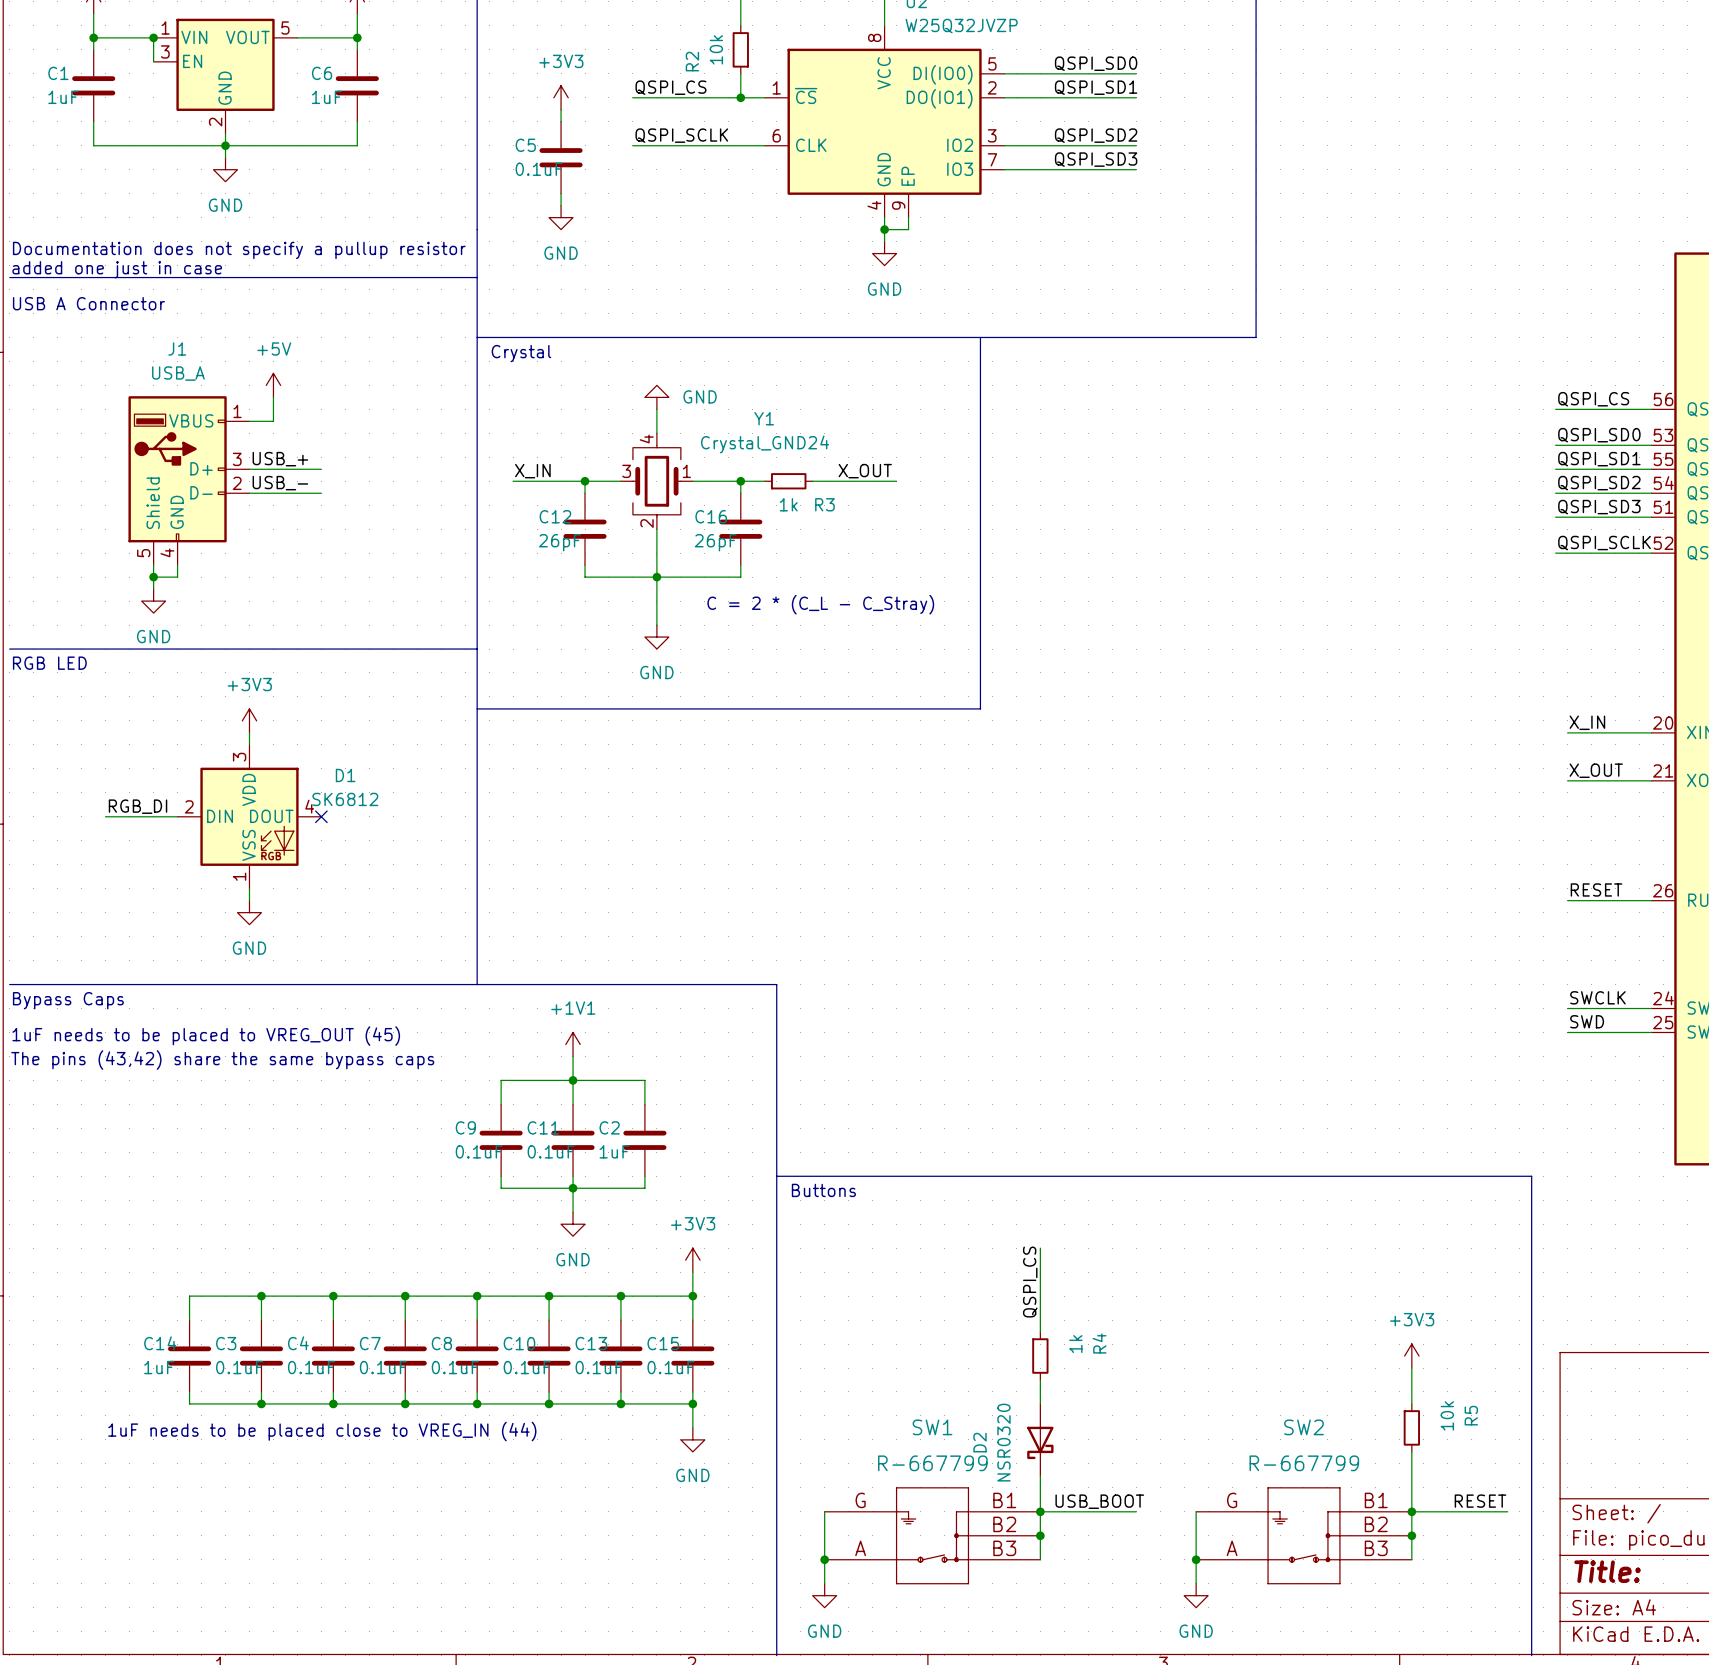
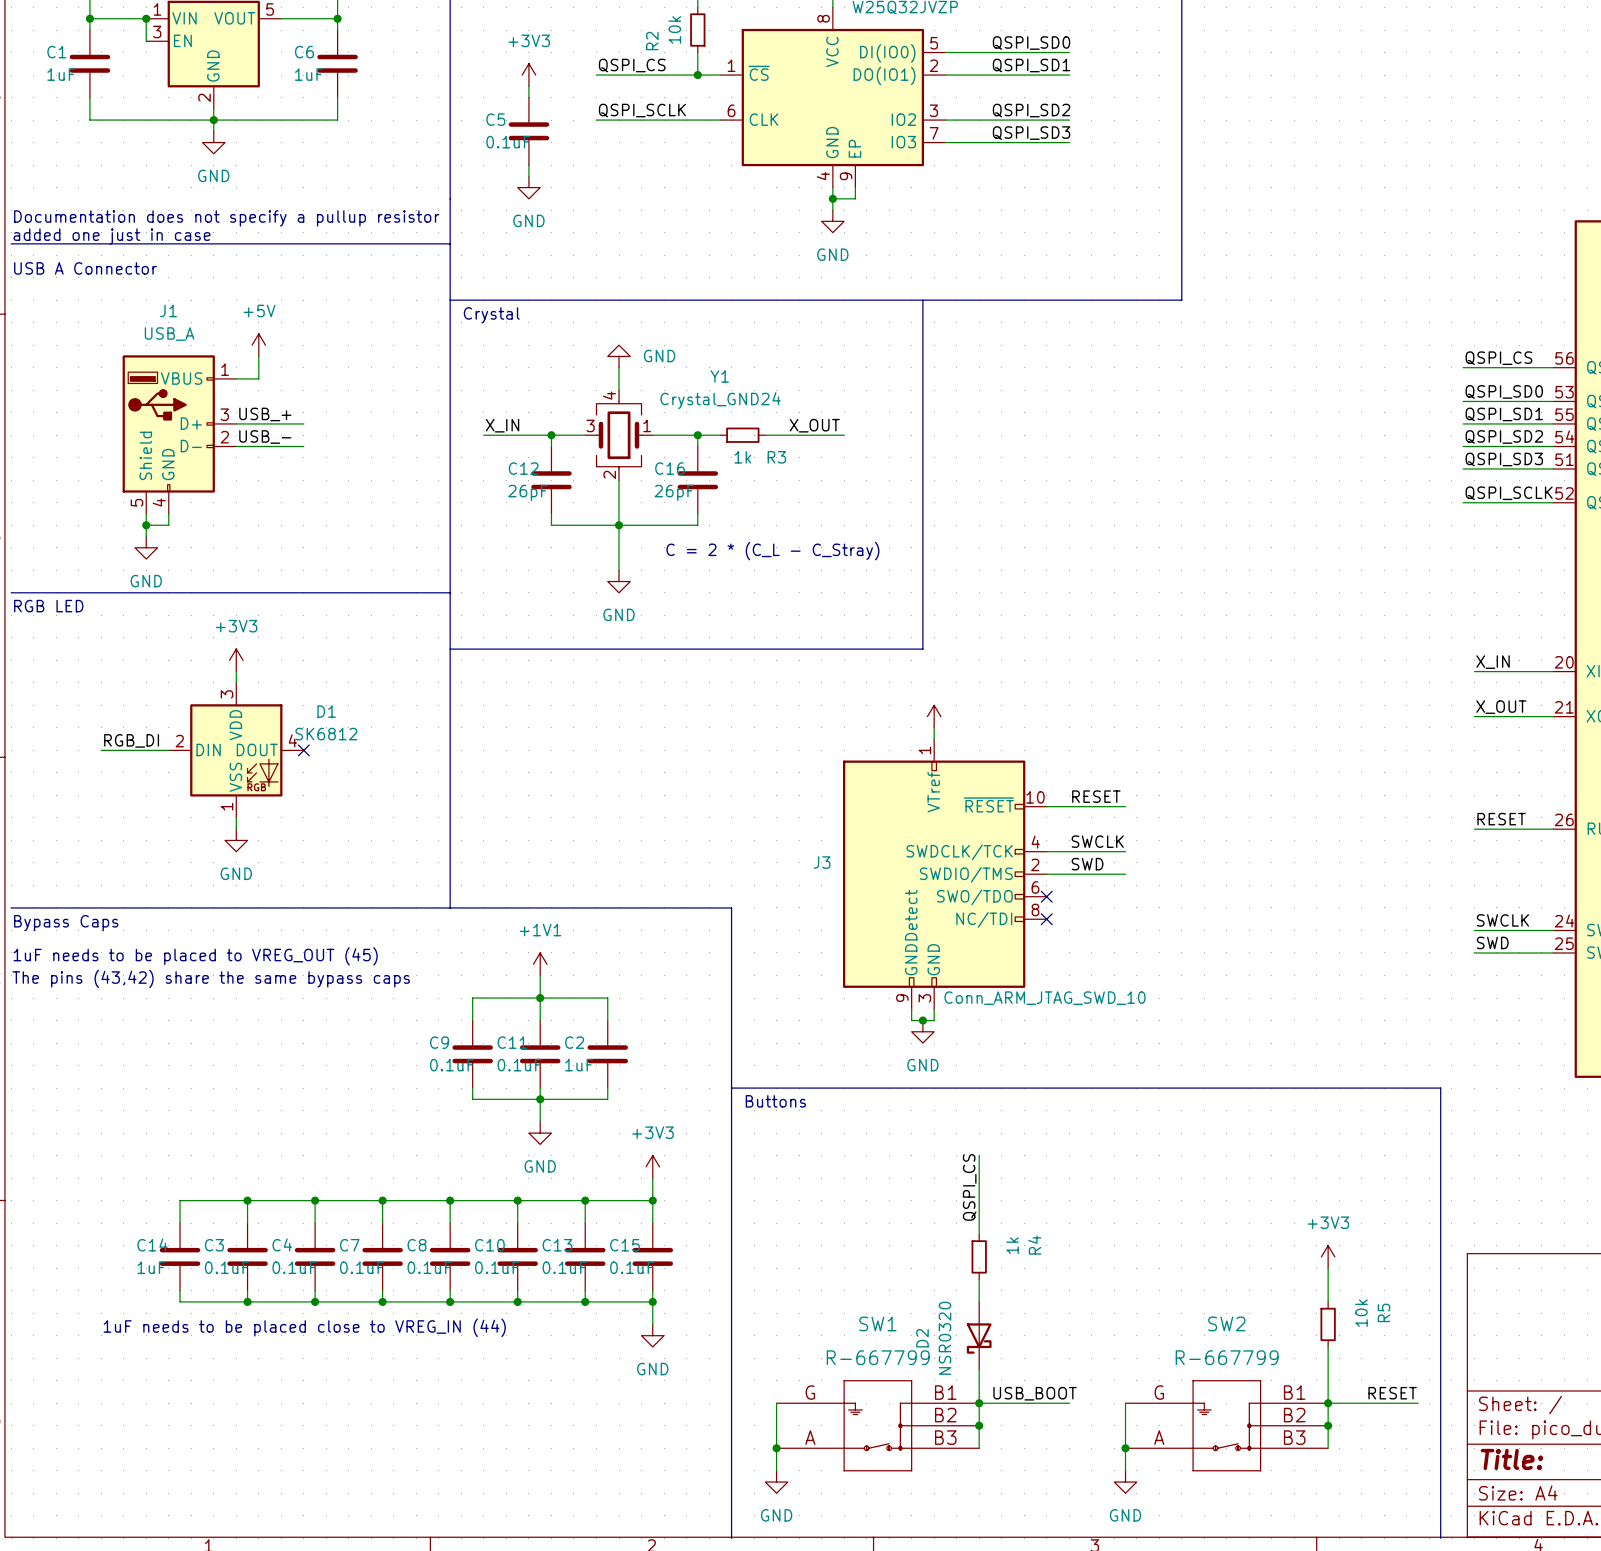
power symbol: none -> (934, 716)
wire: none -> (934, 727) (934, 739)
label: none -> RESET (1096, 796)
wire: none -> (1046, 806) (1125, 806)
label: none -> SWCLK (1097, 841)
wire: none -> (1046, 851) (1125, 851)
label: none -> SWD (1087, 864)
J3: none -> Conn_ARM_JTAG_SWD_10 (944, 874)
wire: none -> (1046, 874) (1125, 874)
no-connect mark: none -> (1046, 896)
no-connect mark: none -> (1046, 919)
wire: none -> (911, 1009) (911, 1020) (934, 1020) (934, 1009)
junction: none -> (922, 1020)
power symbol: none -> GND (922, 1031)

